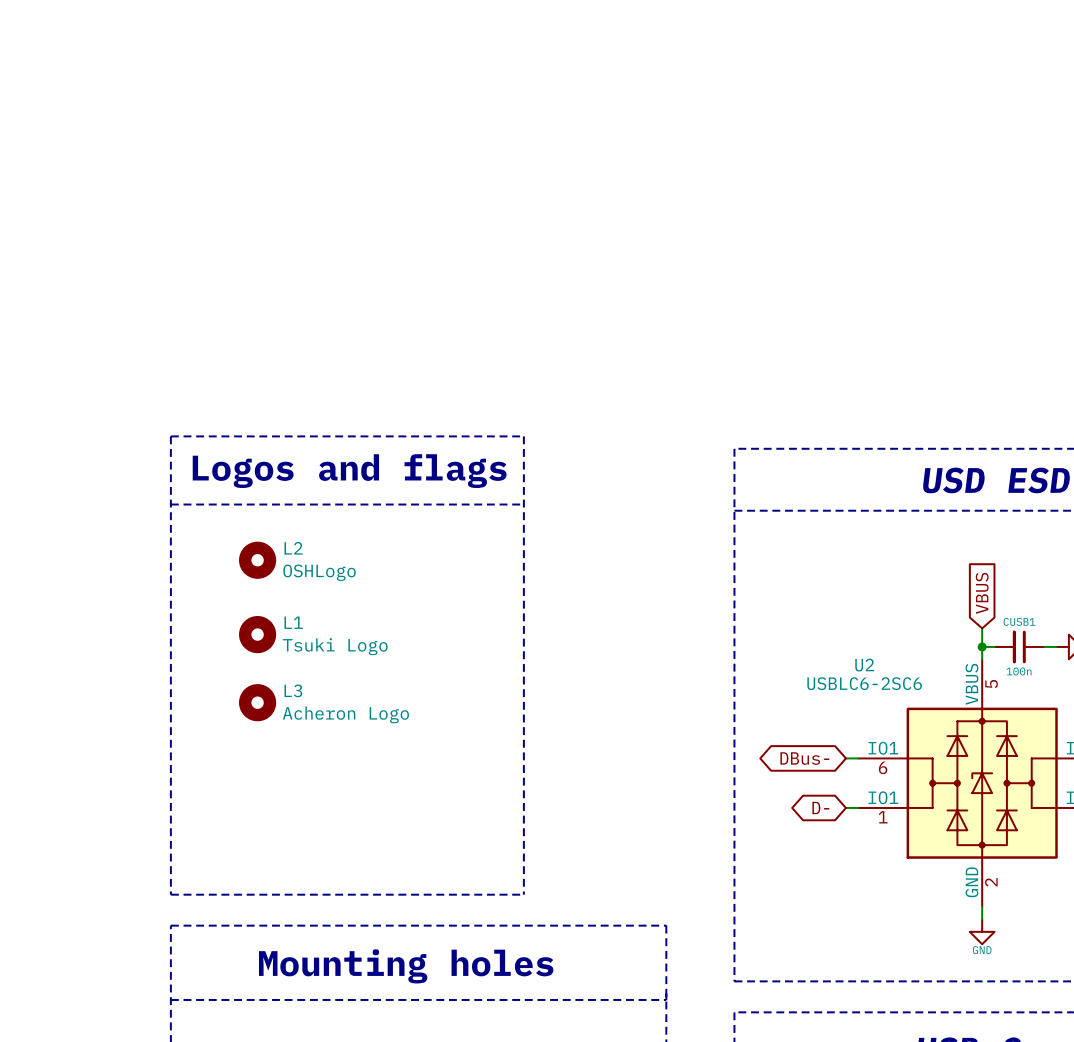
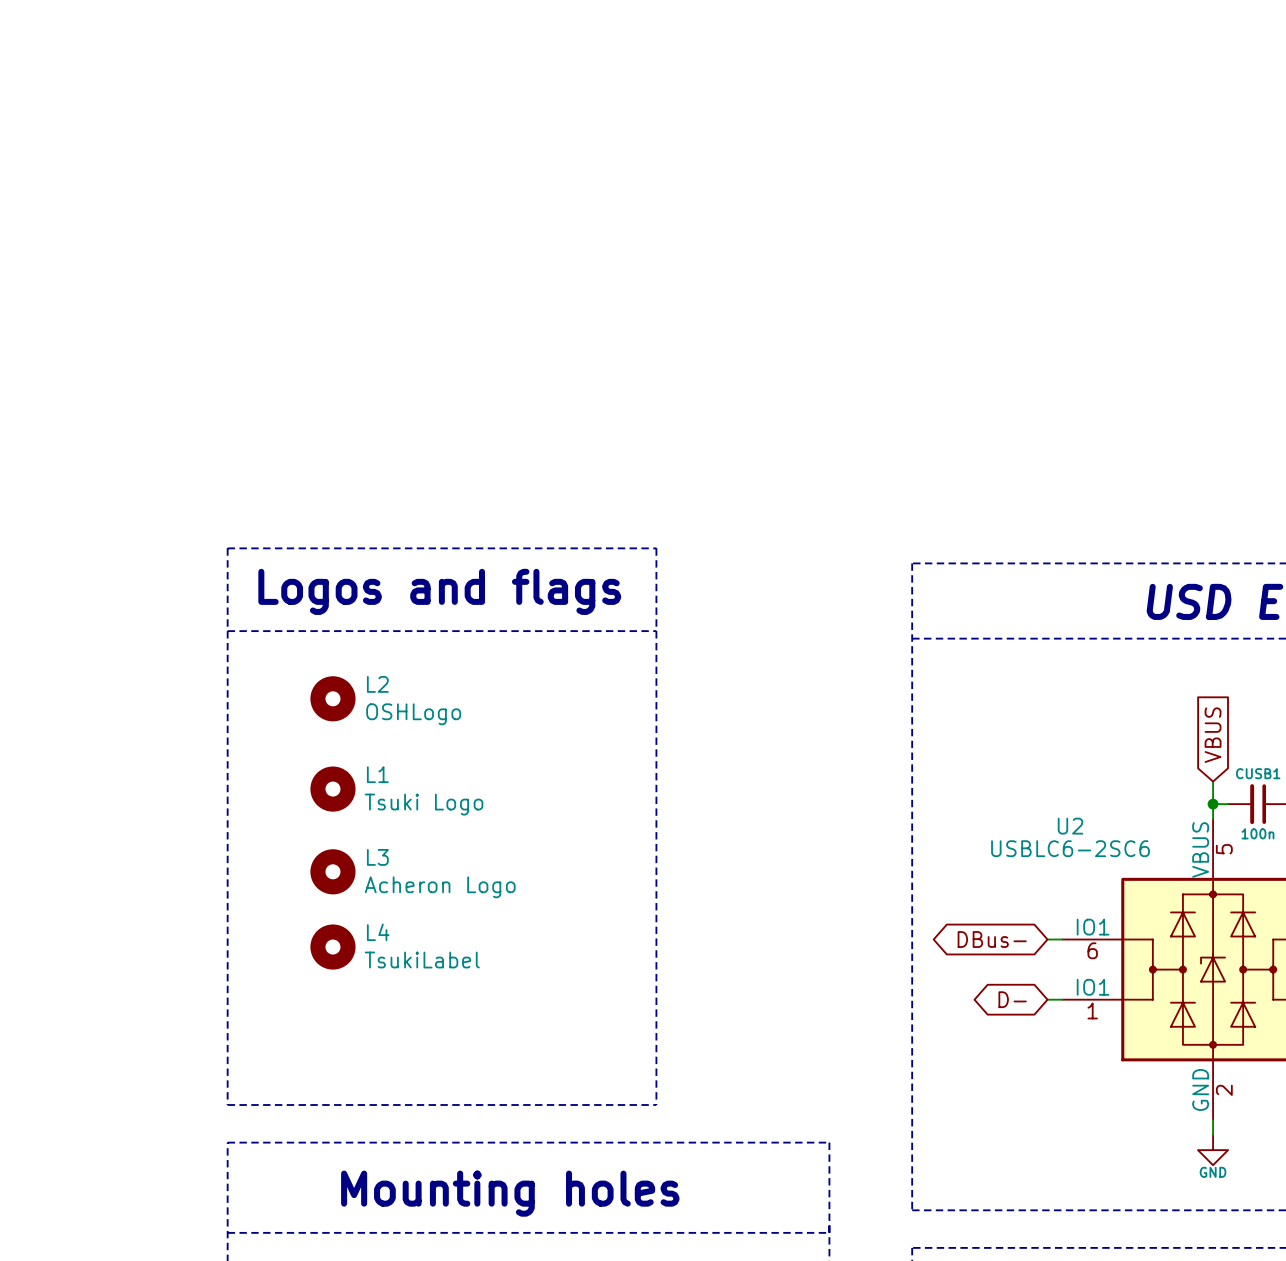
L4: none -> TsukiLabel (332, 947)

